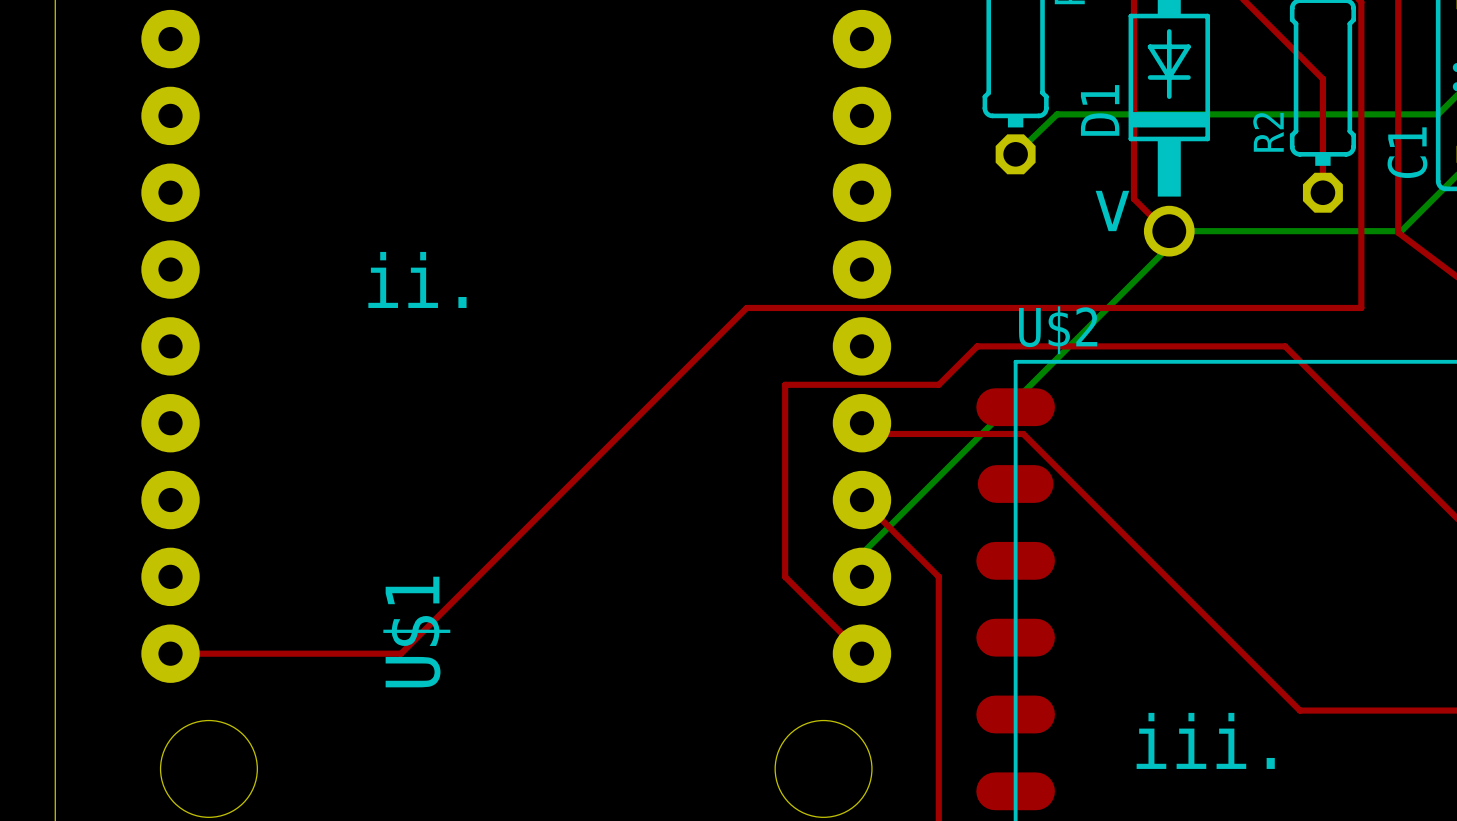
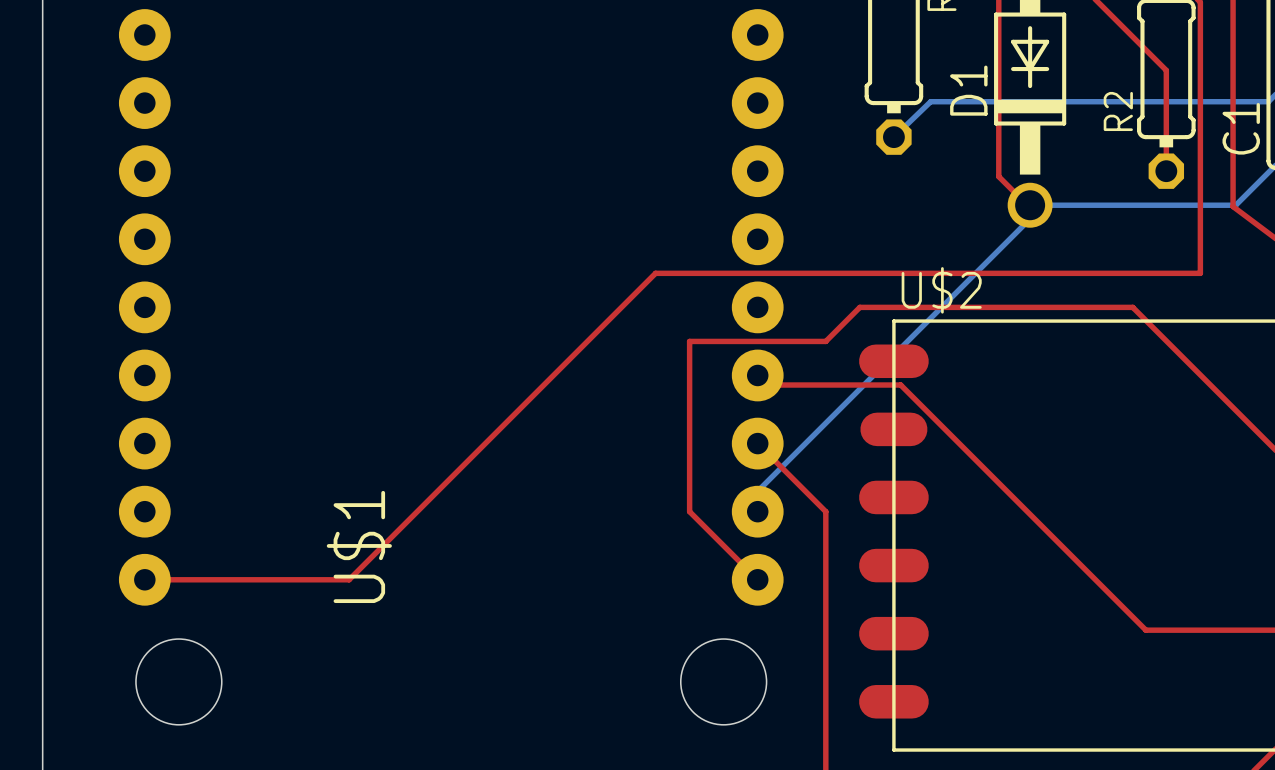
text: v (1112, 210) -> none
text: ii. (417, 279) -> none
text: iii. (1205, 740) -> none

